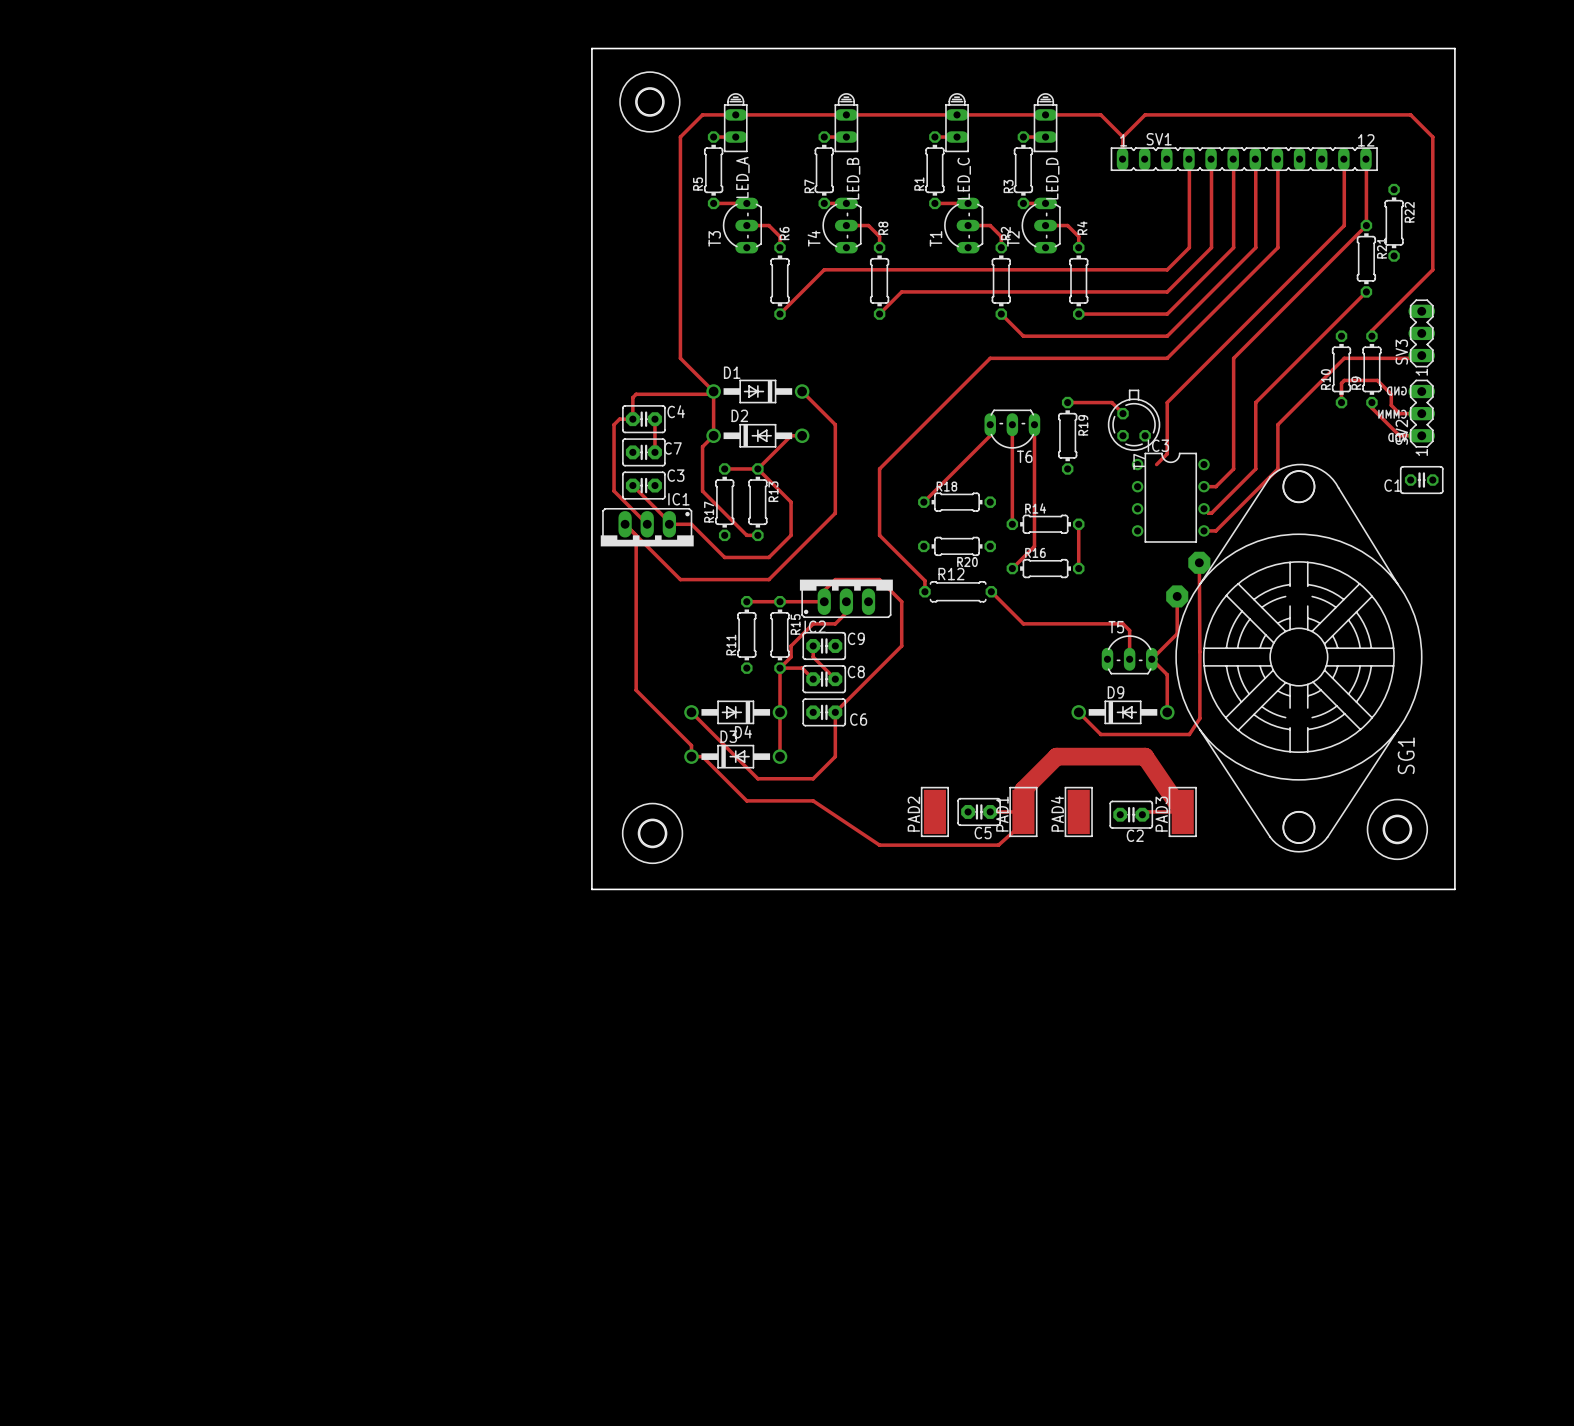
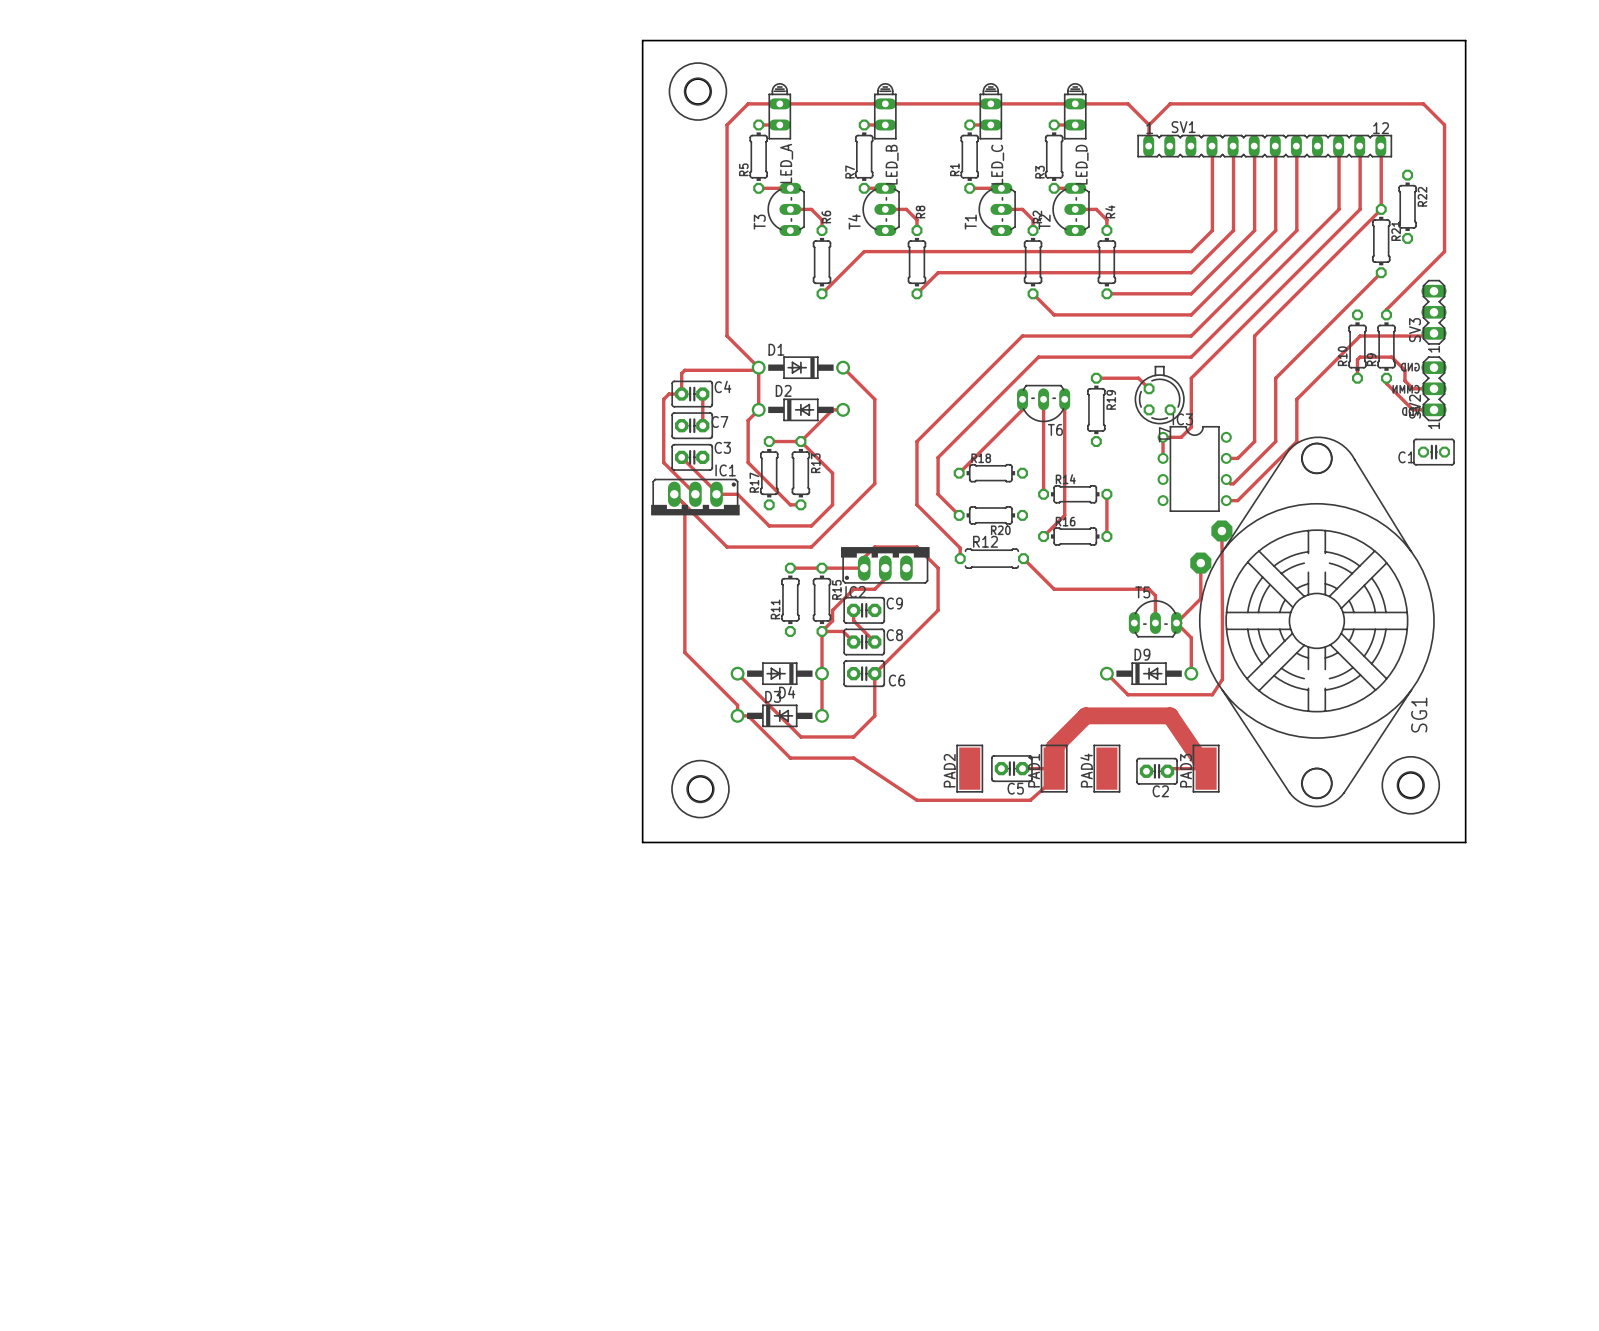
track: none -> (1338, 146) (1339, 209) (1191, 357) (1038, 357) (938, 457) (938, 494) (959, 515)
track: none -> (1181, 437) (1163, 437) (1163, 458)

